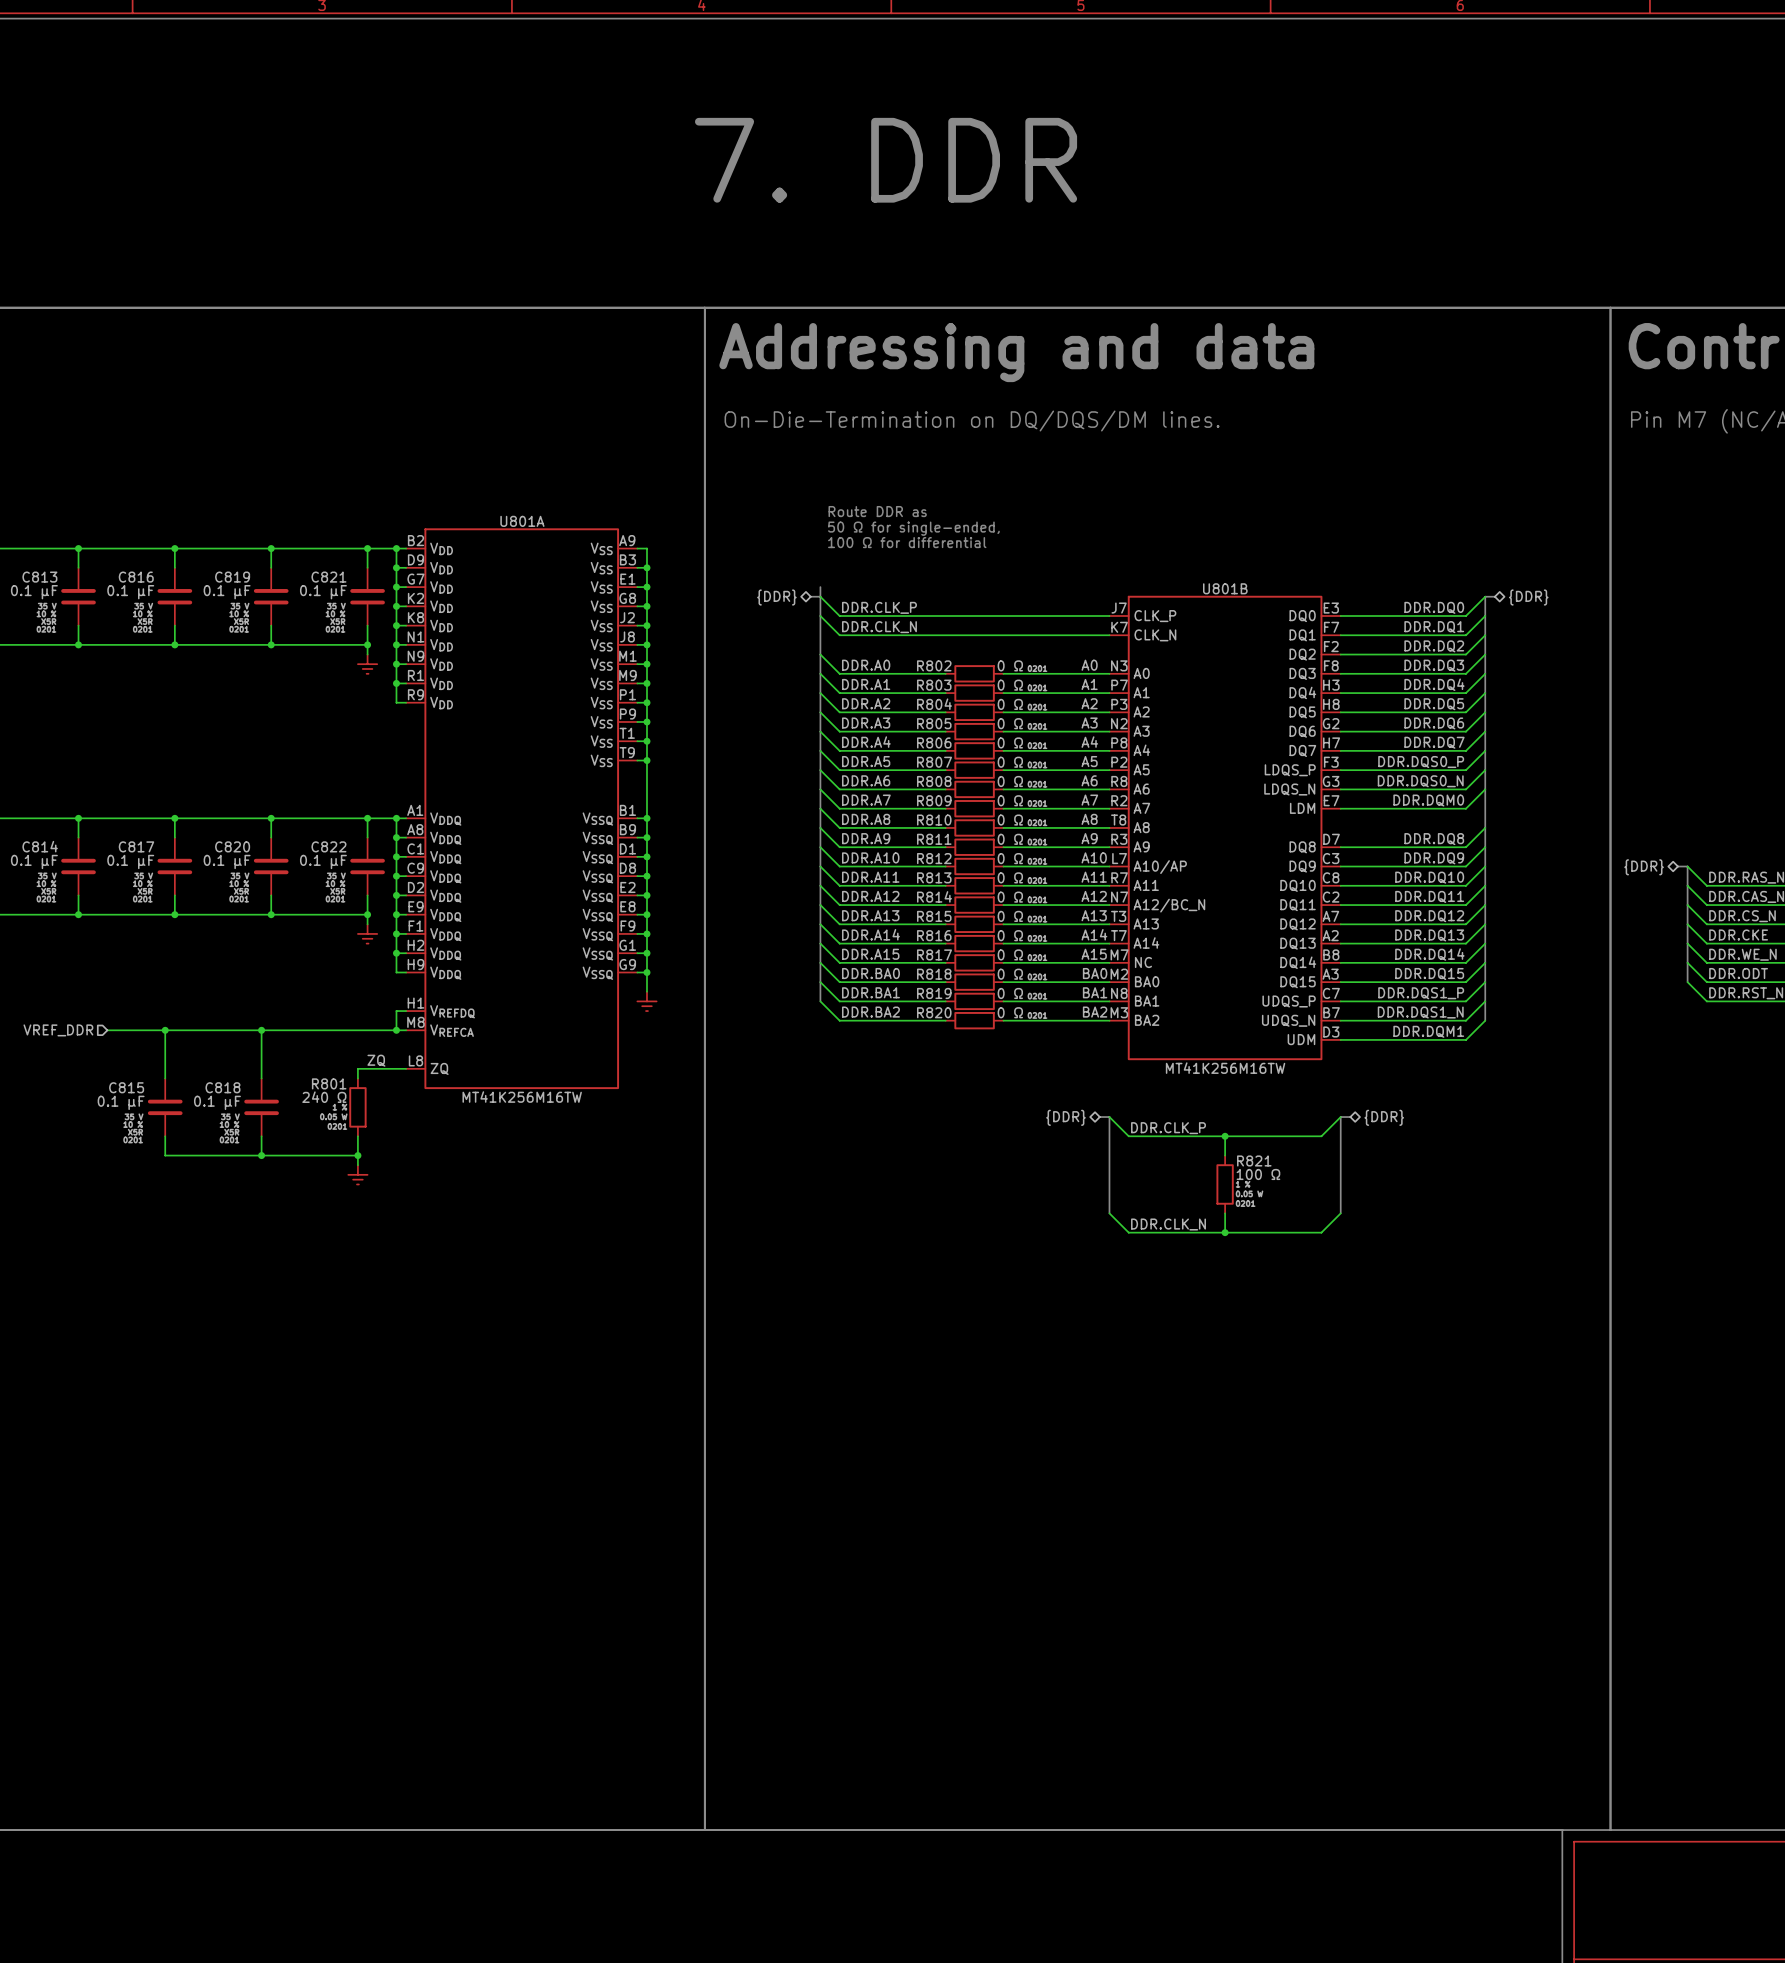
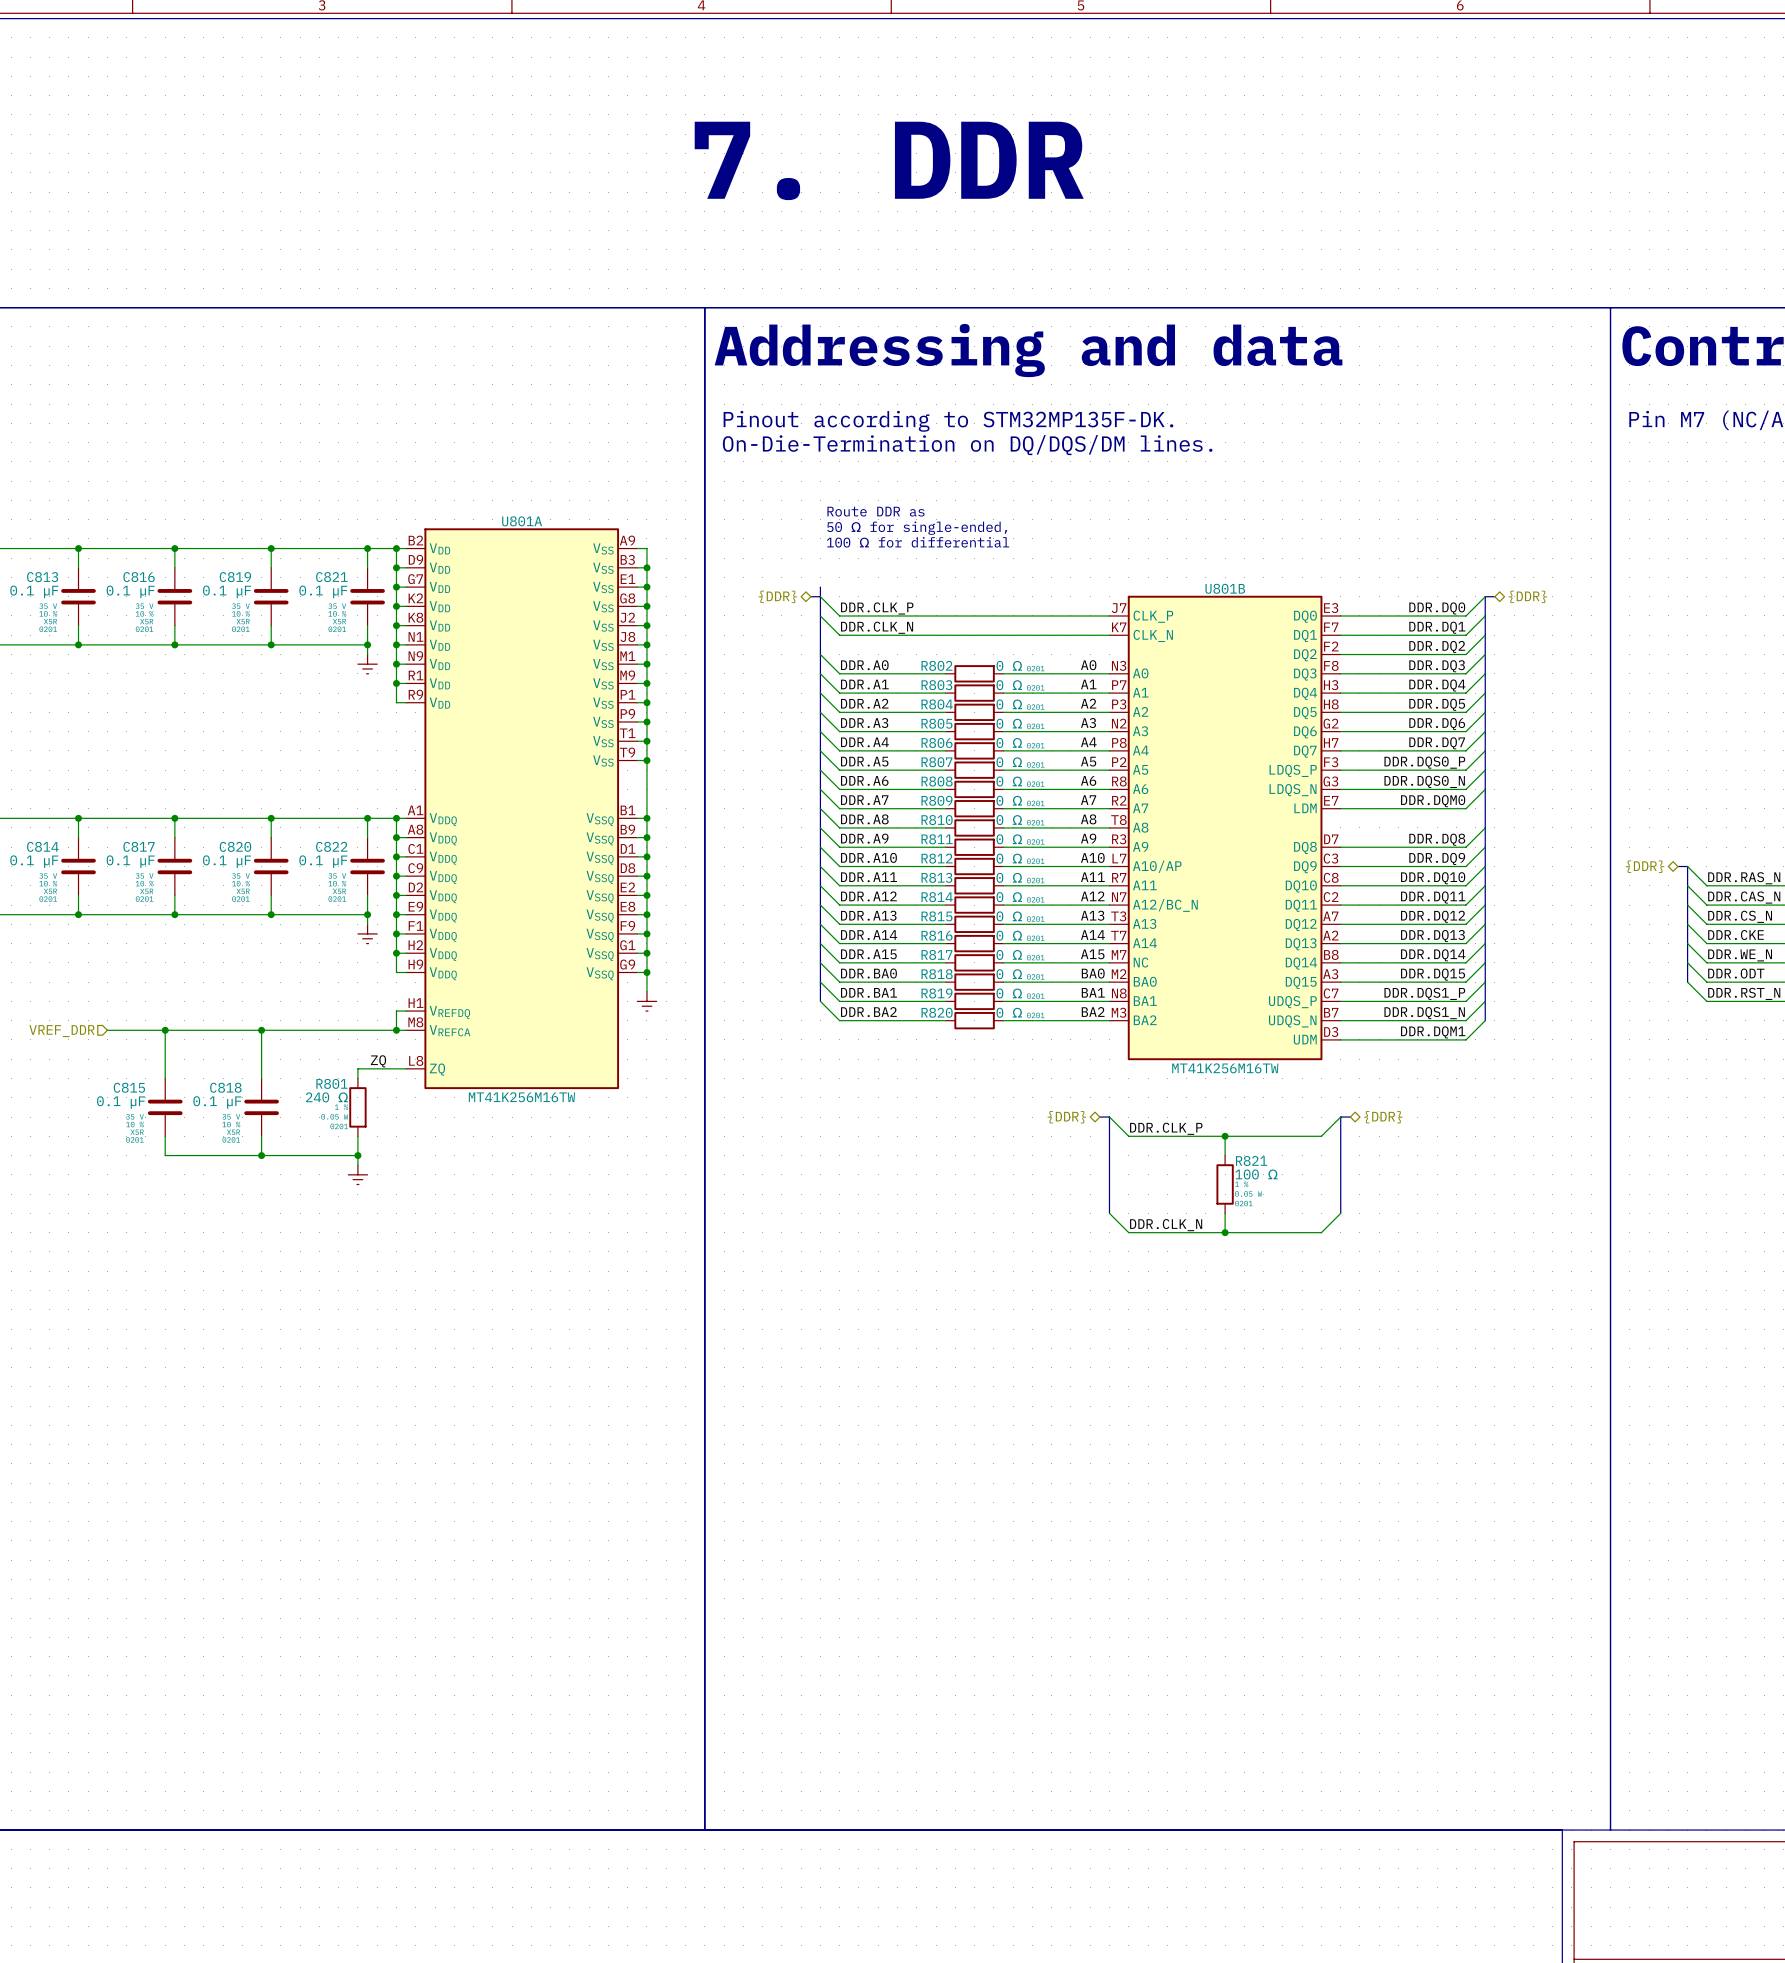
text: On-Die-Termination on DQ/DQS/DM lines. (972, 421) -> Pinout according to STM32MP135F-DK. (948, 421)
text: none -> On-Die-Termination on DQ/DQS/DM lines. (967, 445)

